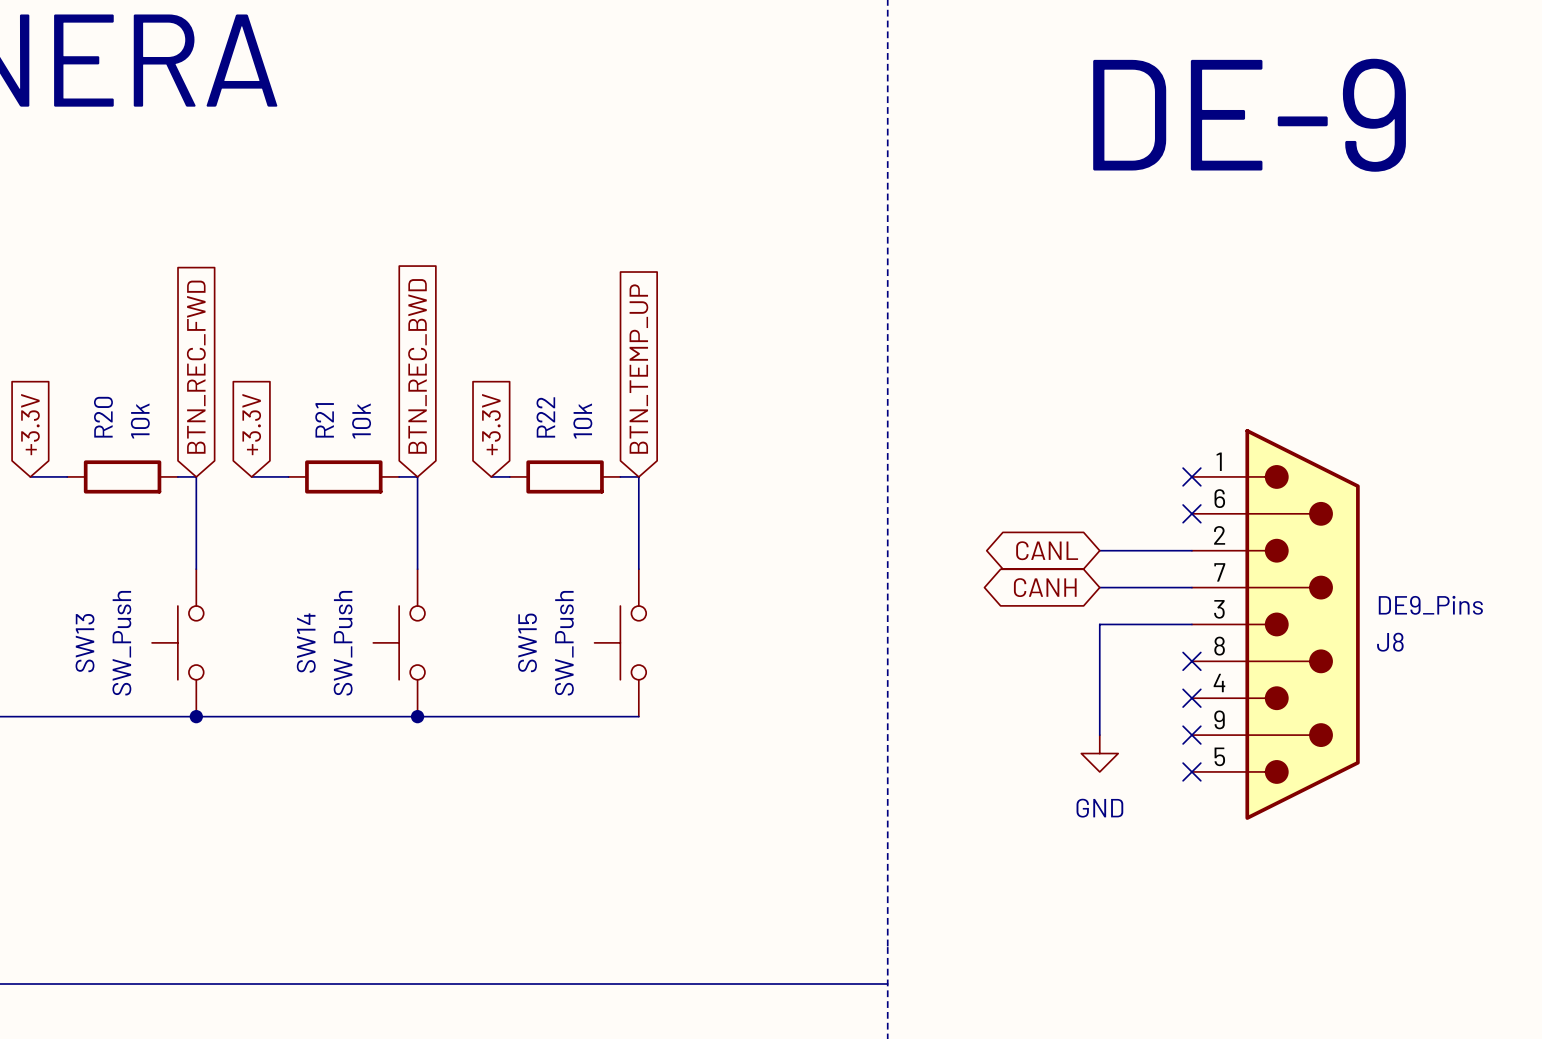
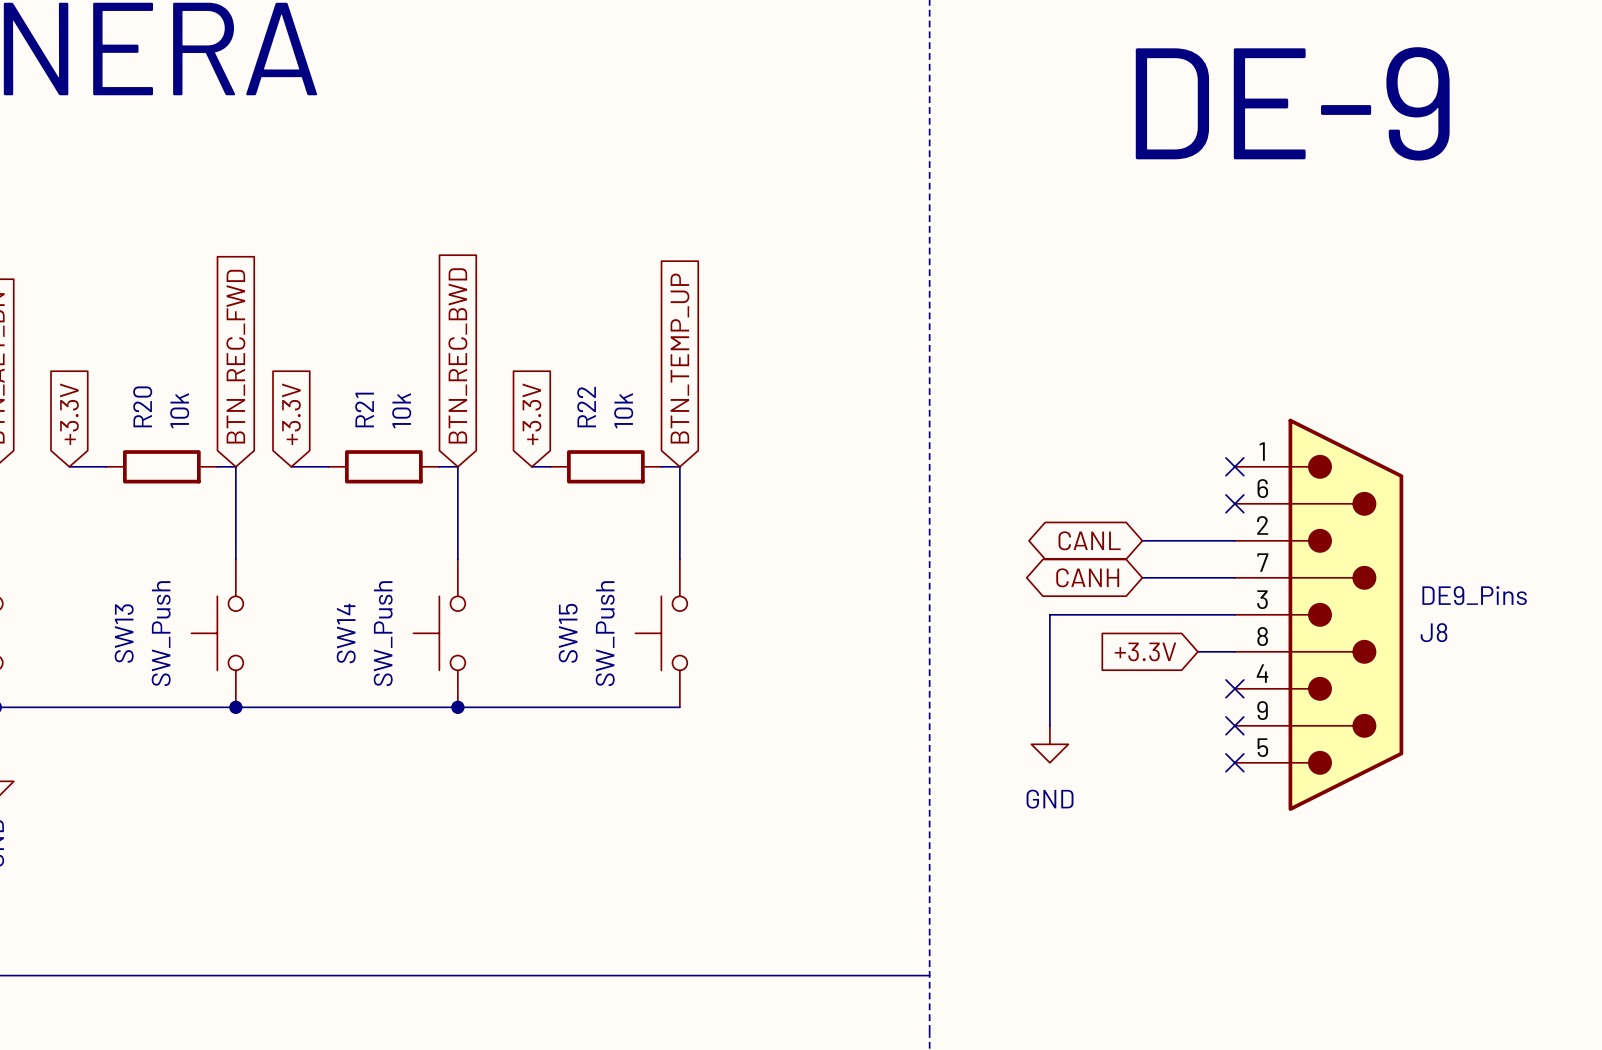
wire: (1099, 624) (1099, 735) -> (1142, 614) (1049, 614) (1049, 725)
global label: none -> +3.3V (1145, 651)
wire: none -> (1197, 651) (1234, 651)
no-connect mark: (1191, 661) -> none
power symbol position: GND (1099, 753) -> GND (1049, 744)

